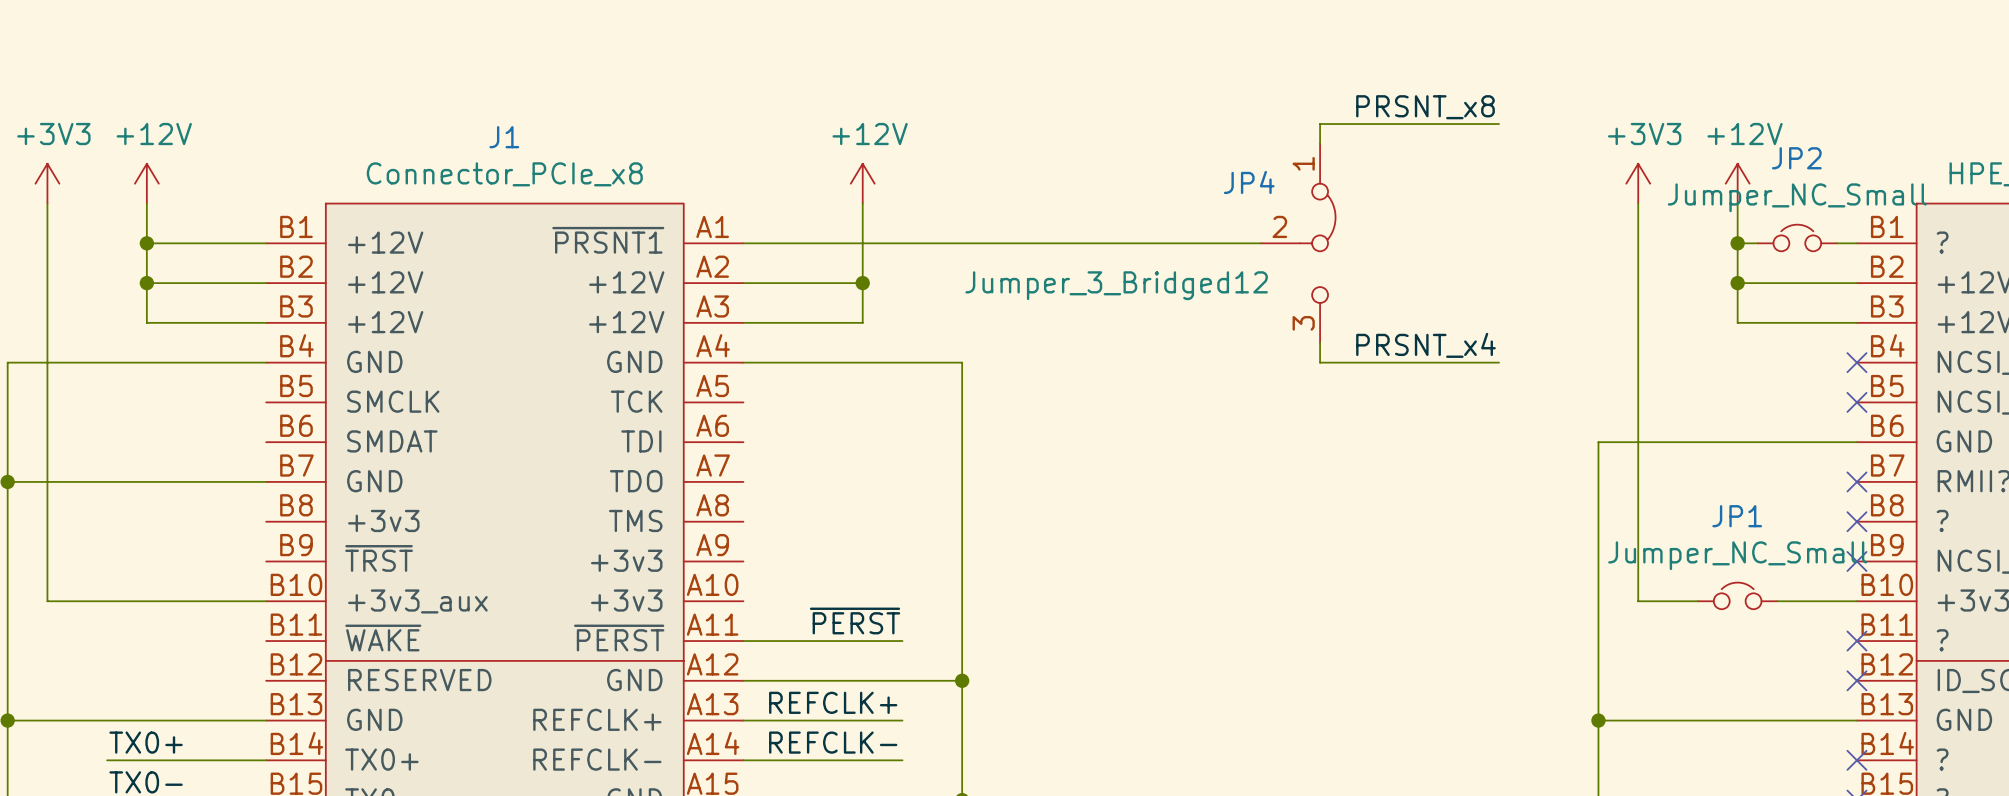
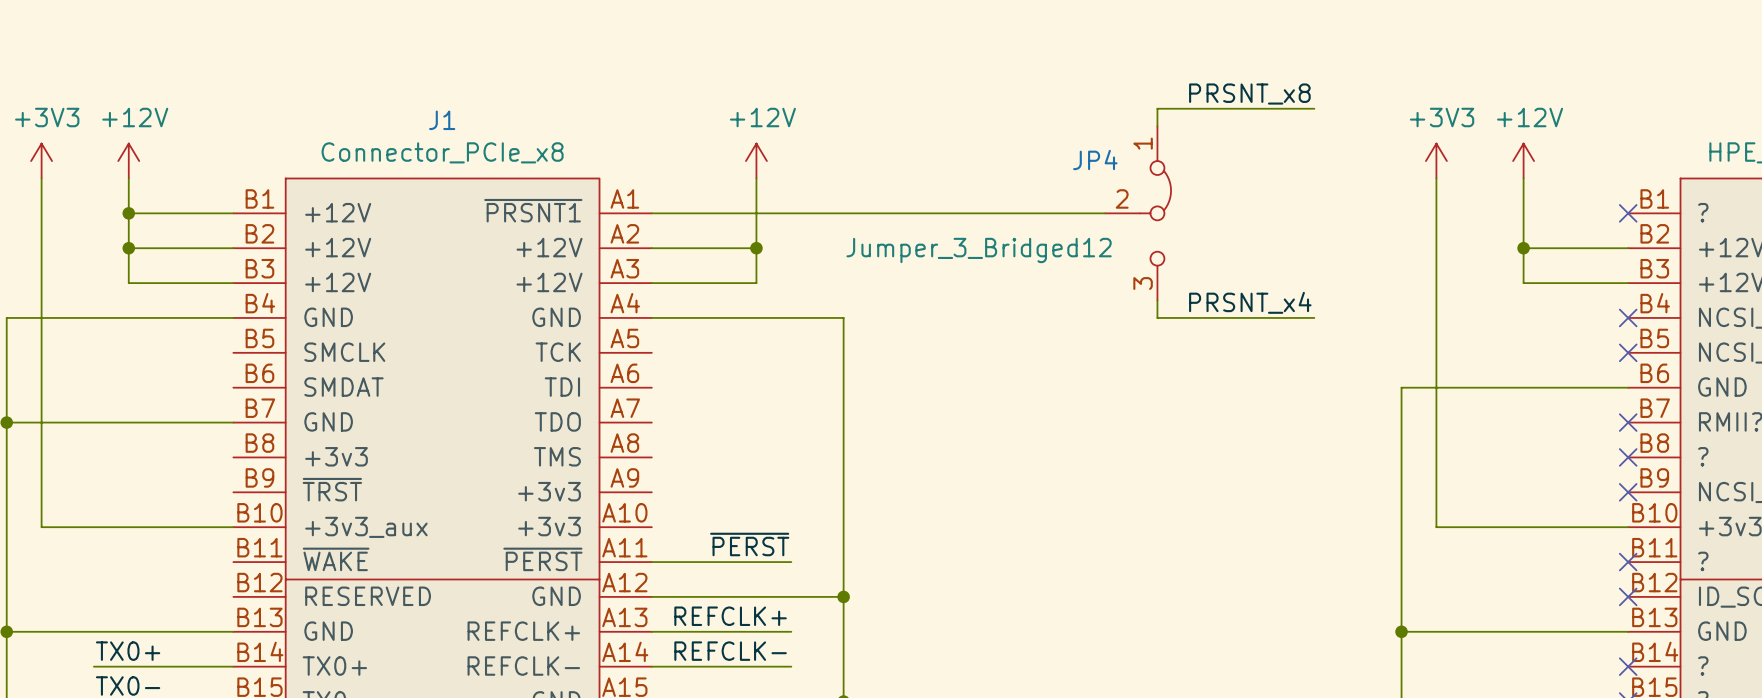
JP2: Jumper_NC_Small (1797, 237) -> none
wire: (1737, 243) (1757, 243) -> none
junction: (1737, 243) -> none
wire: (1837, 243) (1856, 243) -> none
no-connect mark: none -> (1628, 213)
JP1: Jumper_NC_Small (1737, 595) -> none
wire: none -> (1488, 527) (1558, 527)

